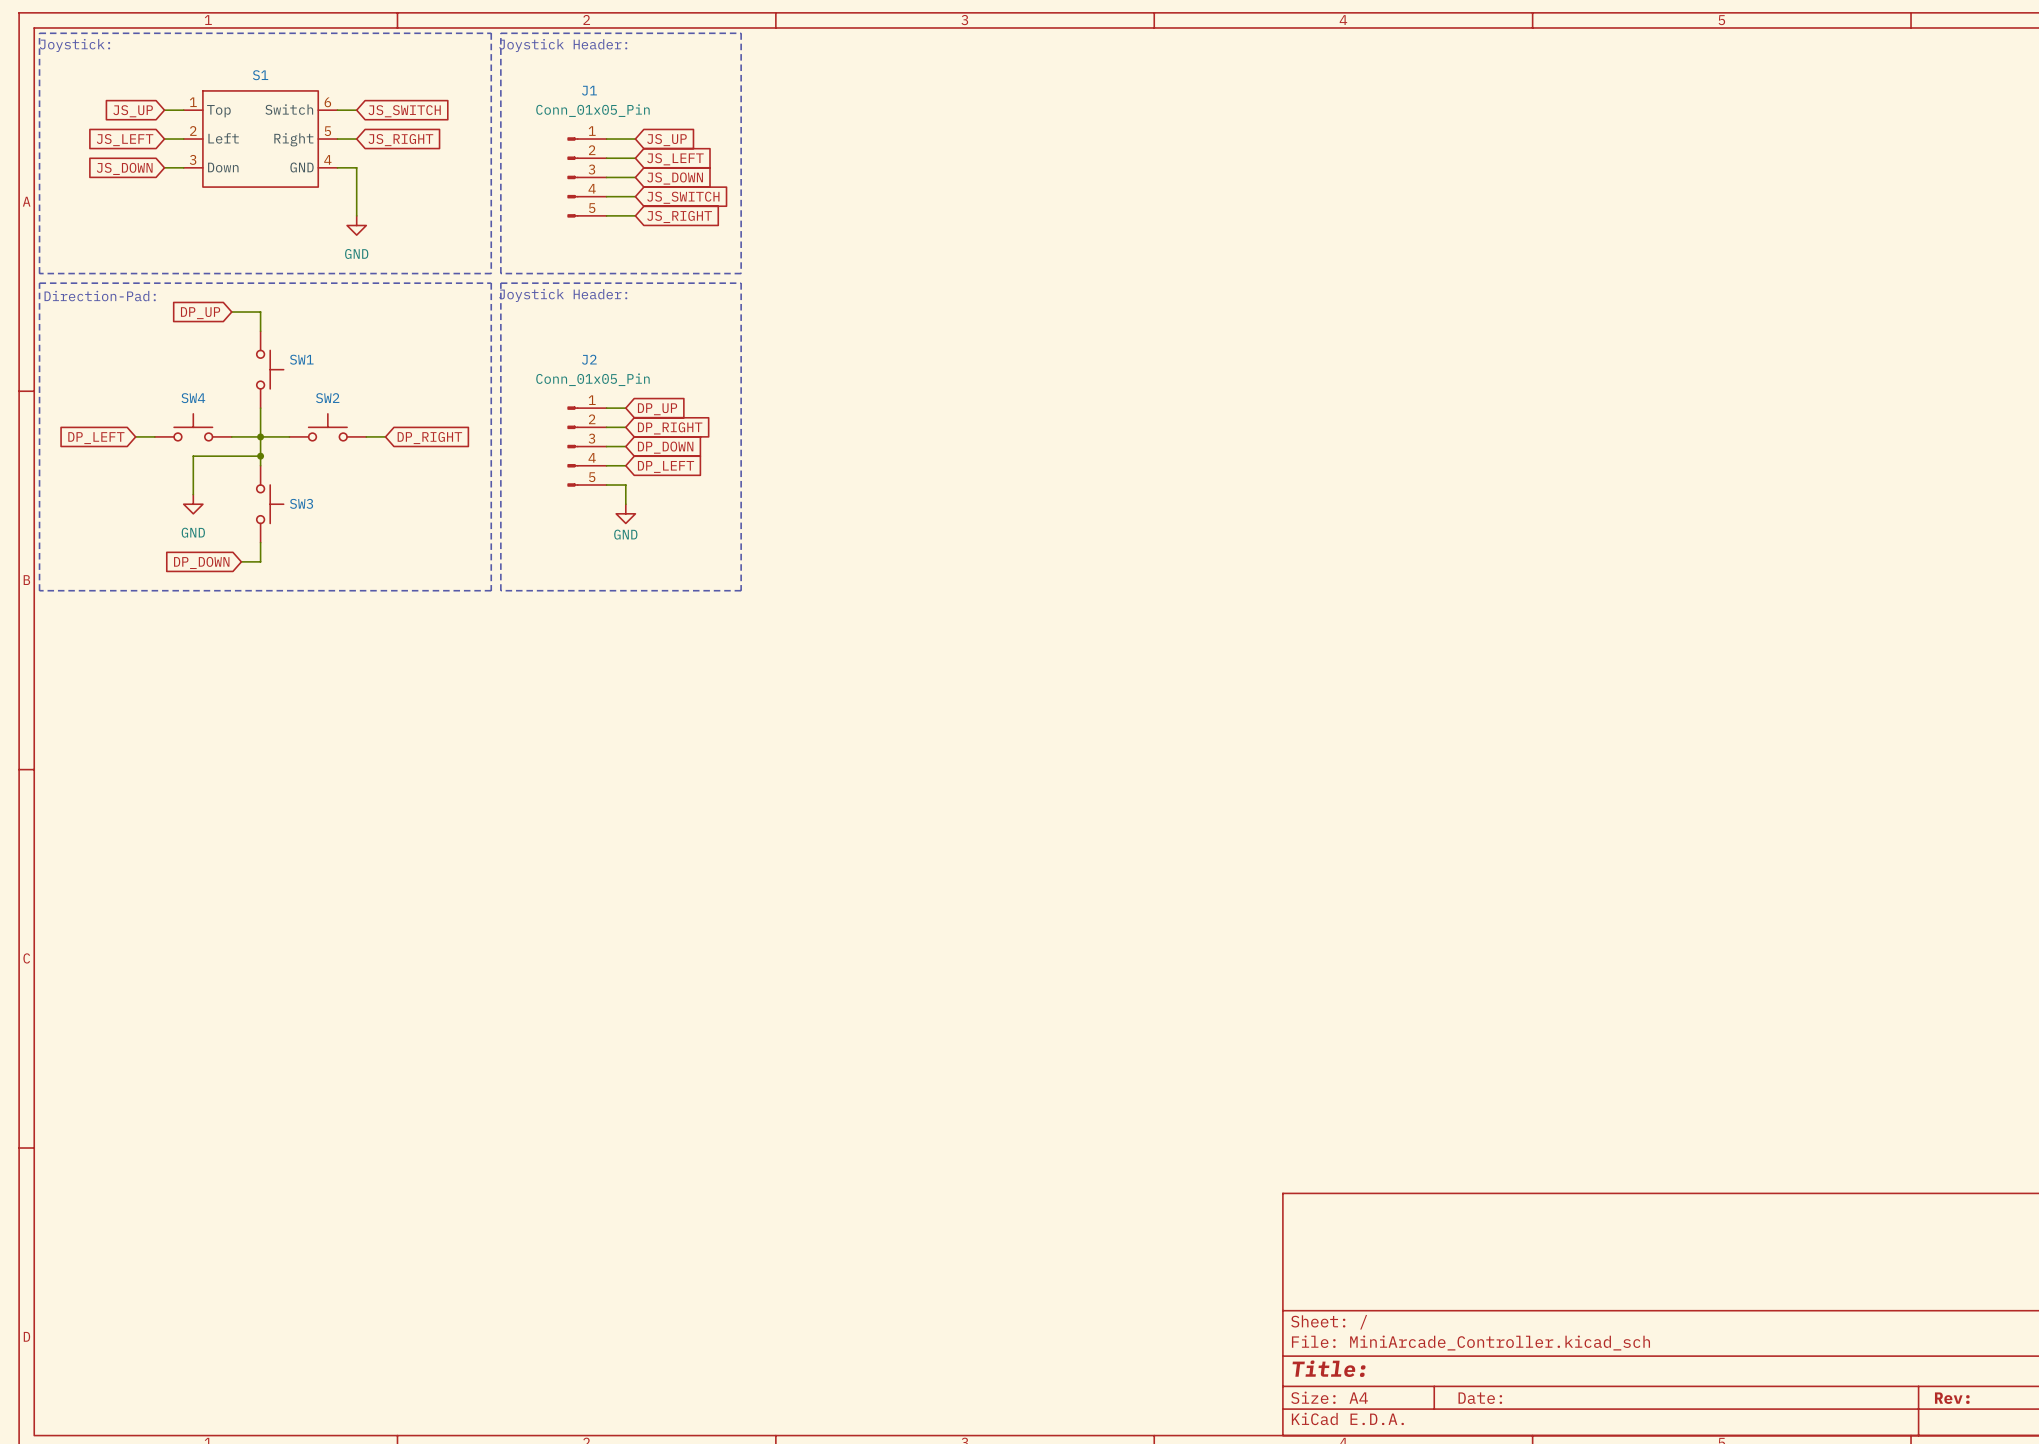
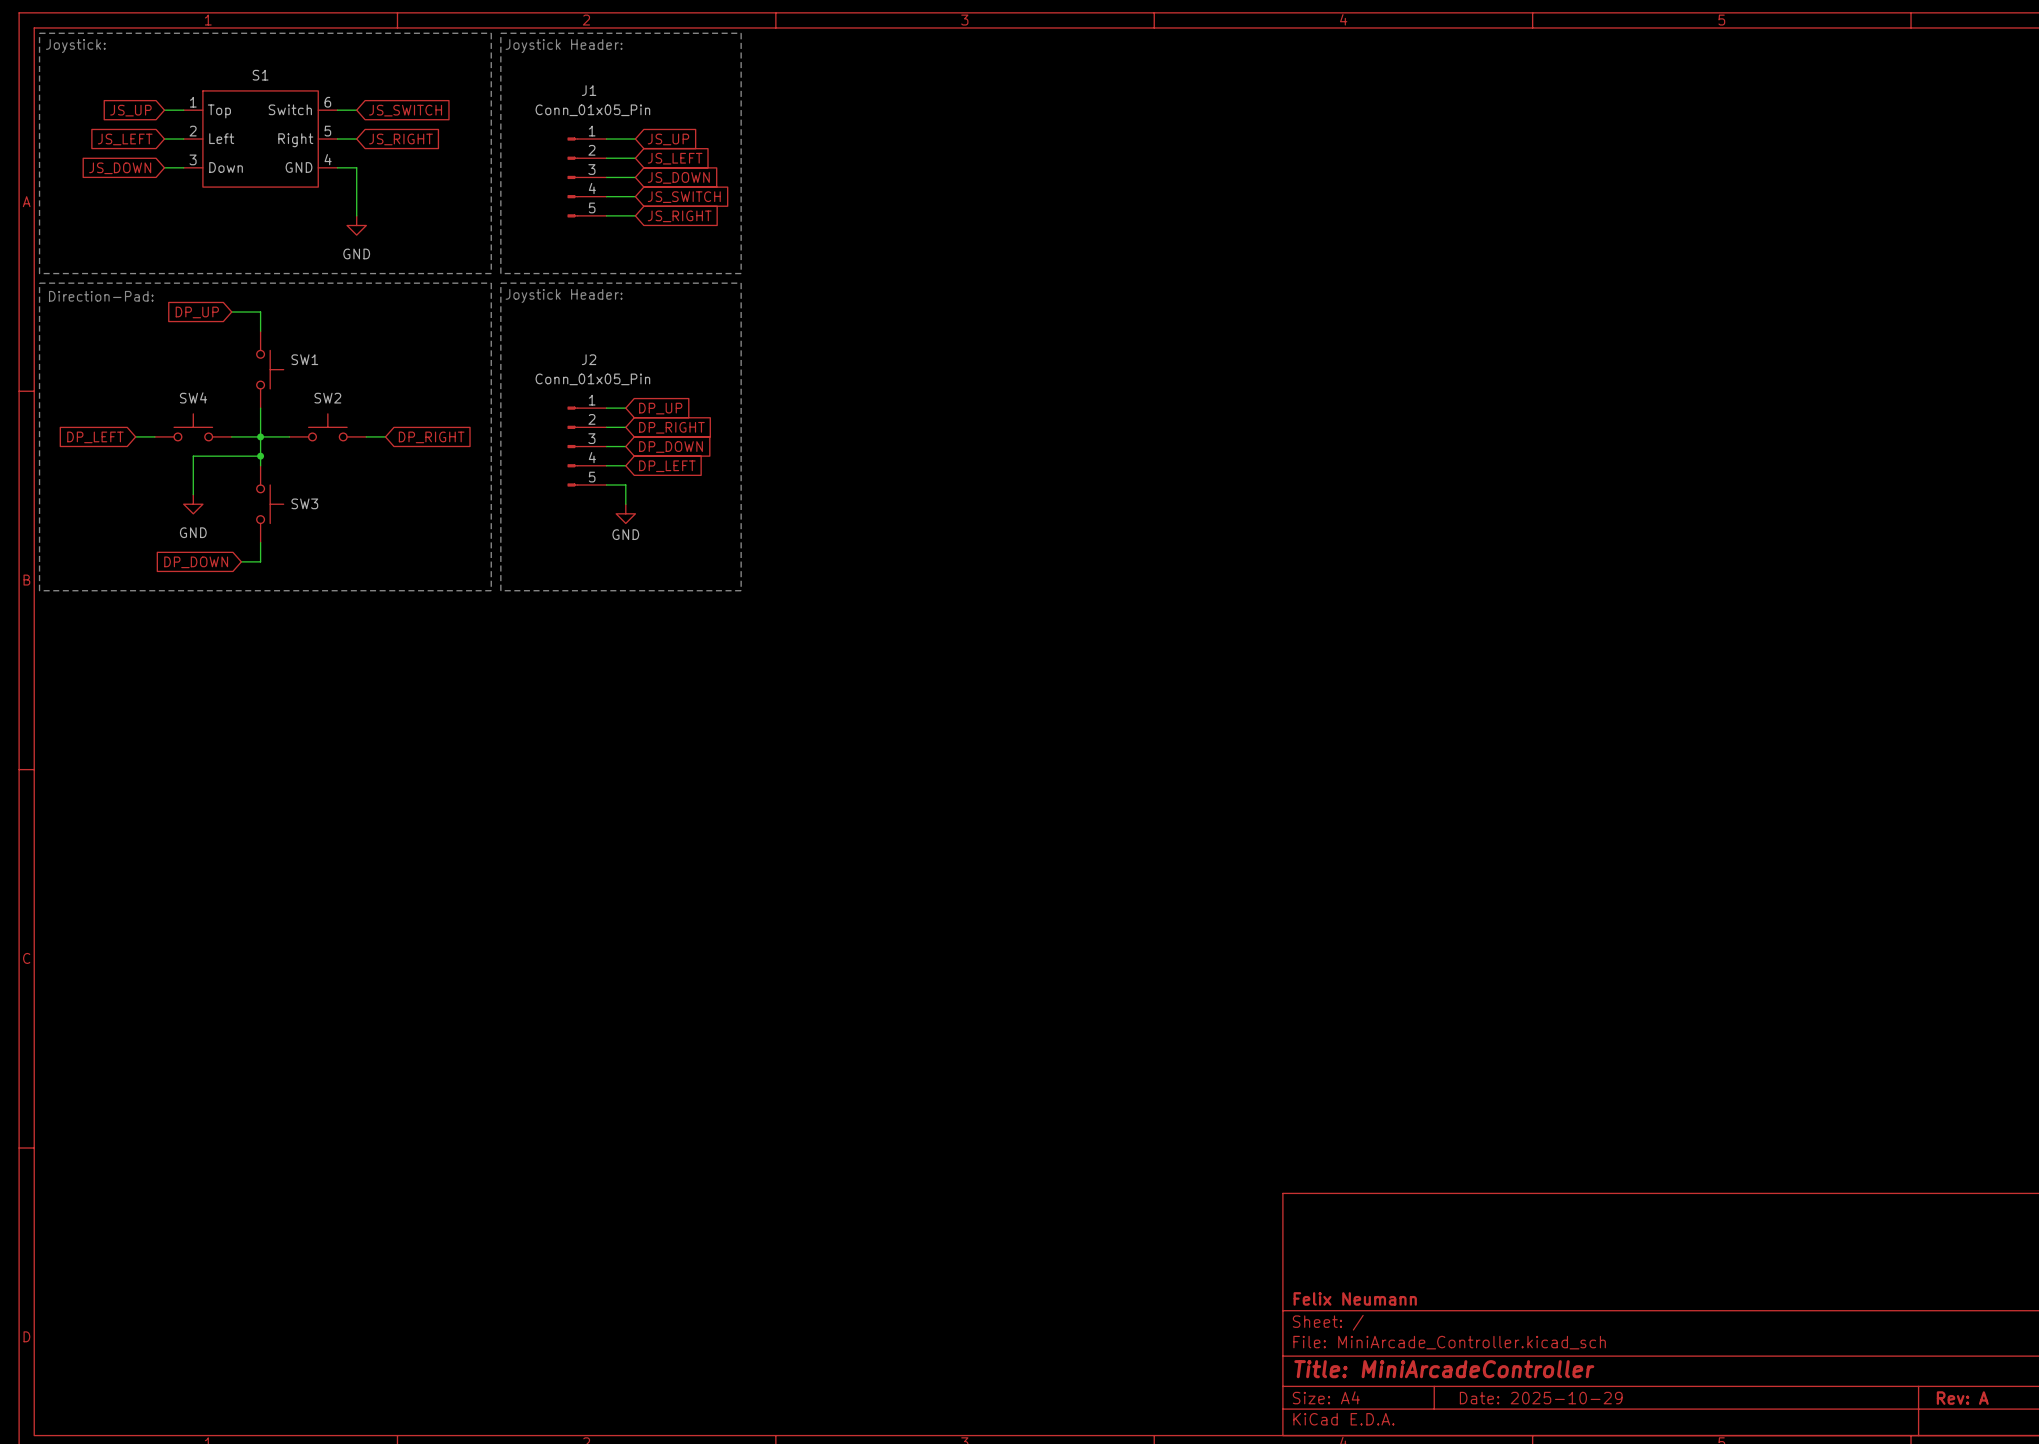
title block: none -> Felix Neumann (1355, 1298)
title block: Title: (1329, 1368) -> Title: MiniArcadeController (1444, 1369)
title block: Date: (1480, 1398) -> Date: 2025-10-29 (1541, 1398)
title block: Rev: (1952, 1398) -> Rev: A (1962, 1398)

